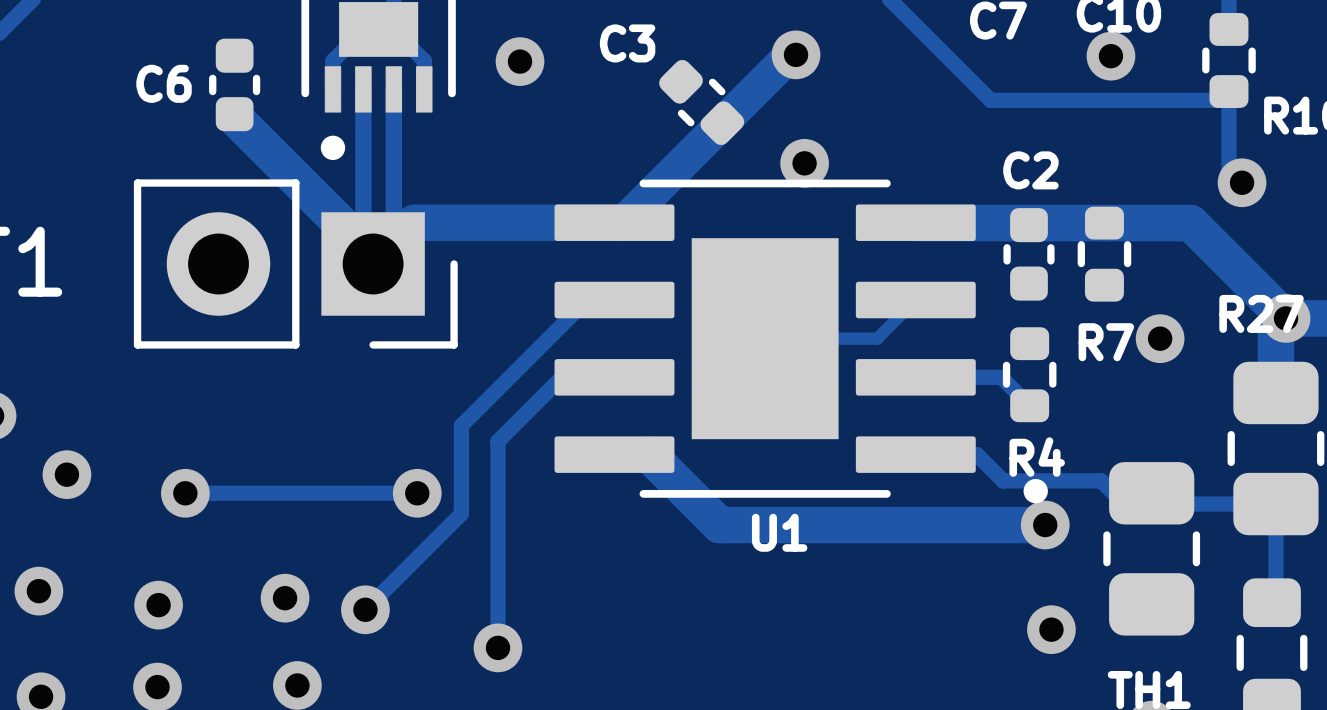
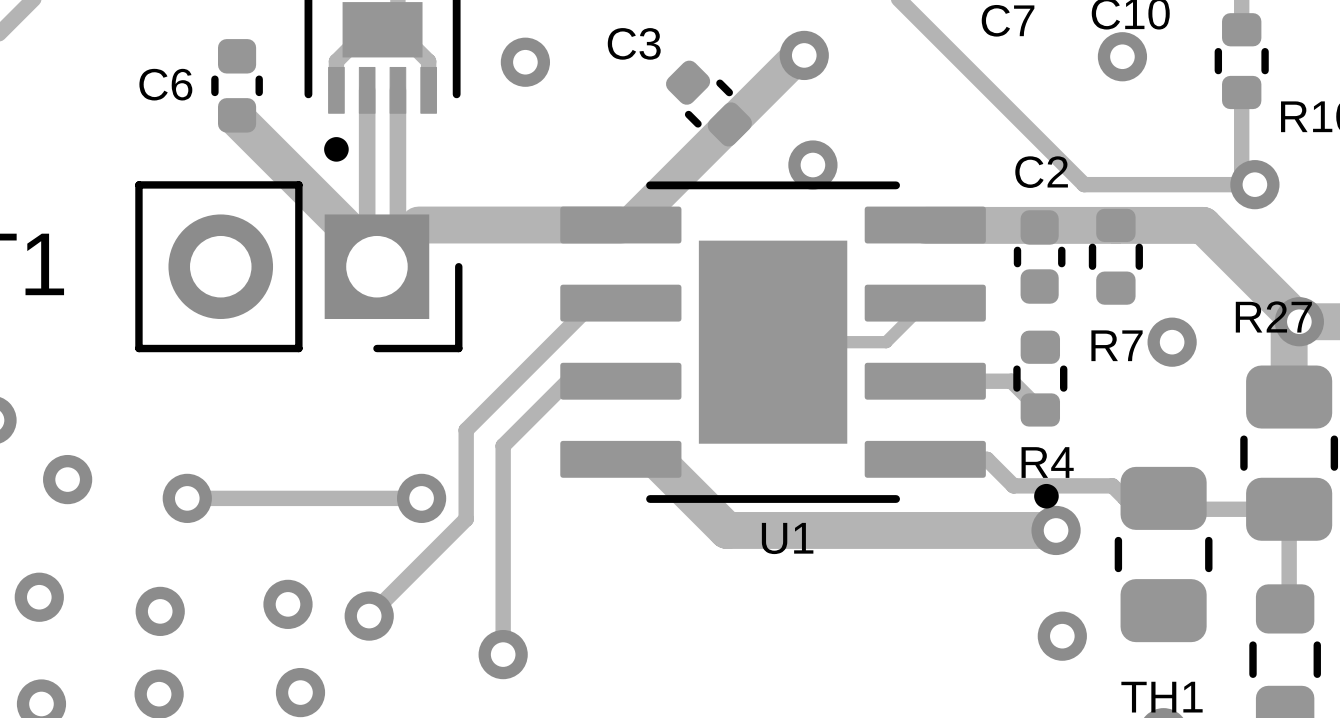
track: (1228, 91) (1220, 100) (990, 100) -> (1254, 184) (1084, 184) (1000, 101)

